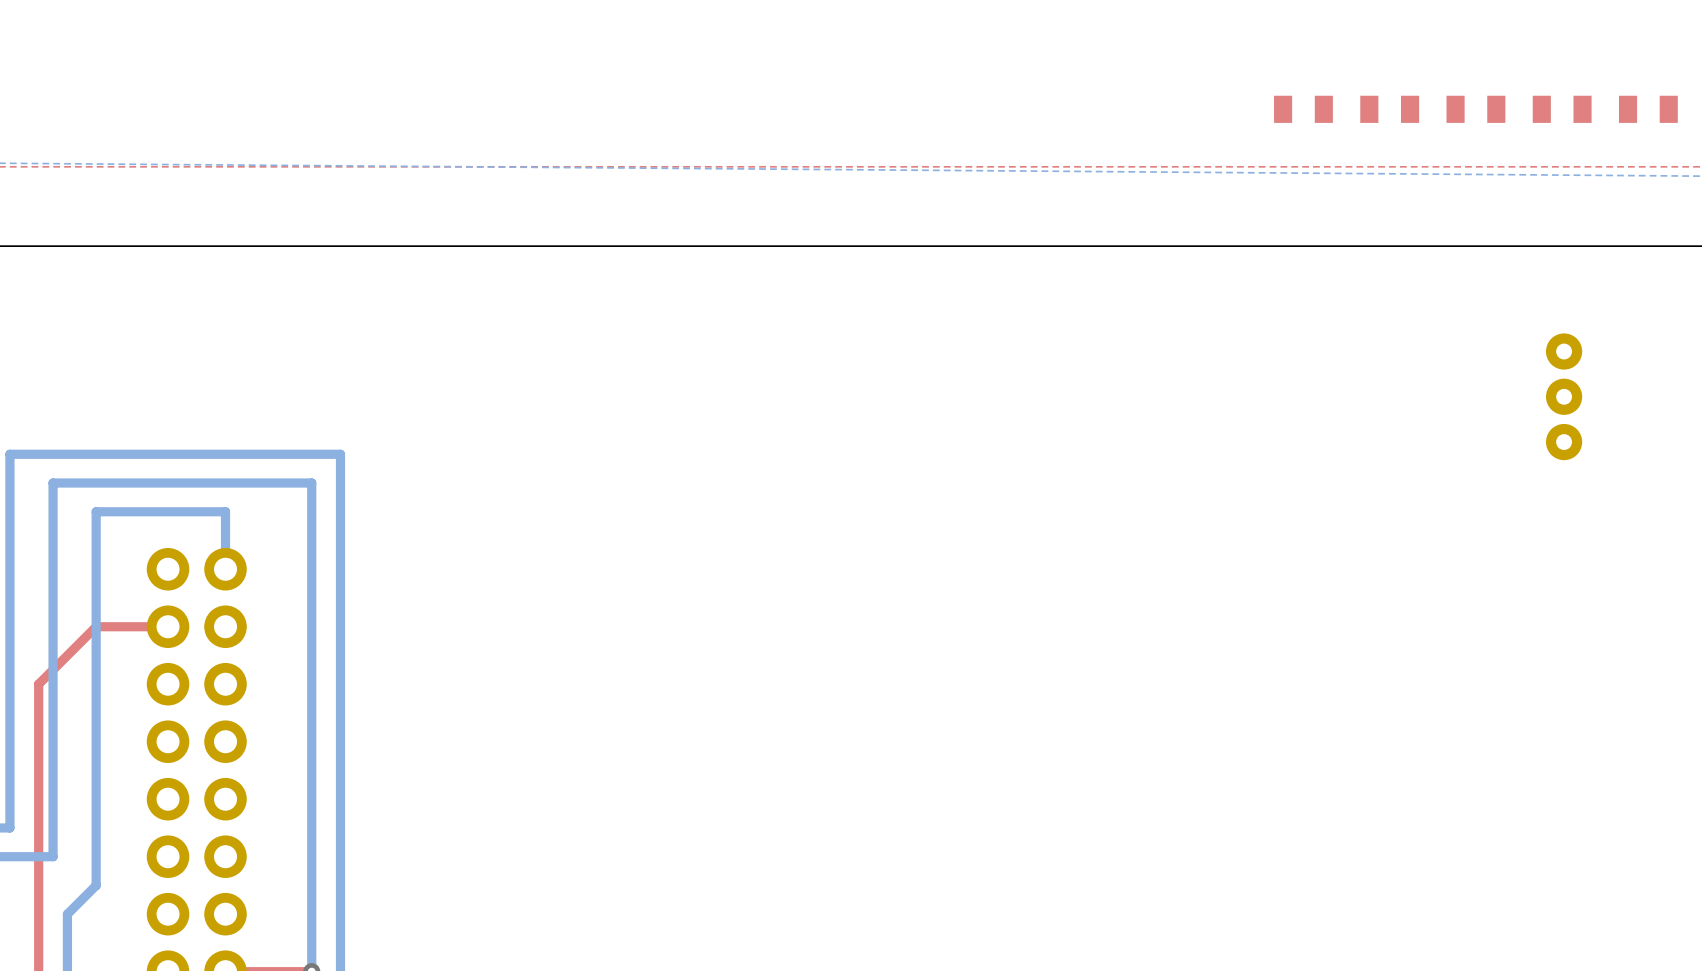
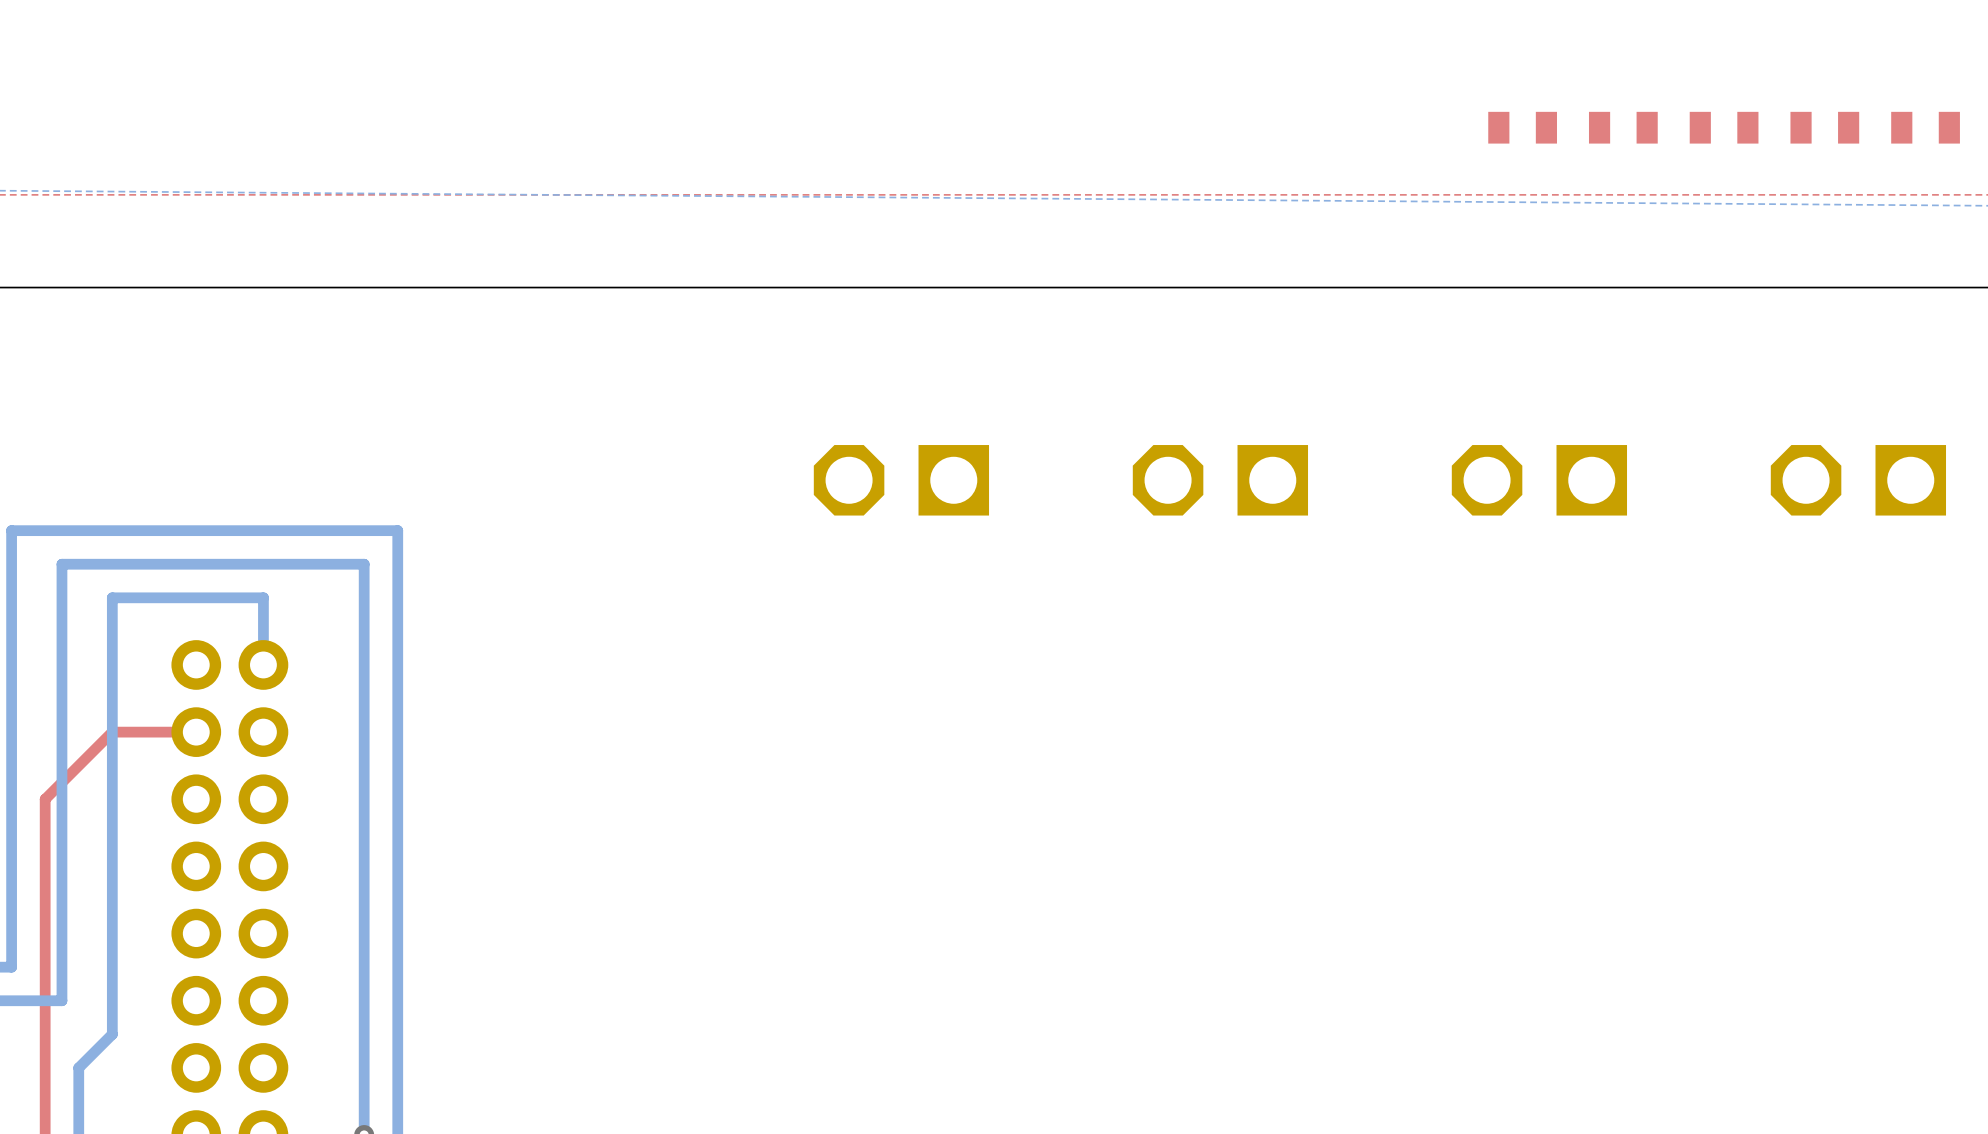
part: (1564, 396) -> none
part: none -> (901, 480)
part: none -> (1220, 480)
part: none -> (1539, 480)
part: none -> (1858, 480)

